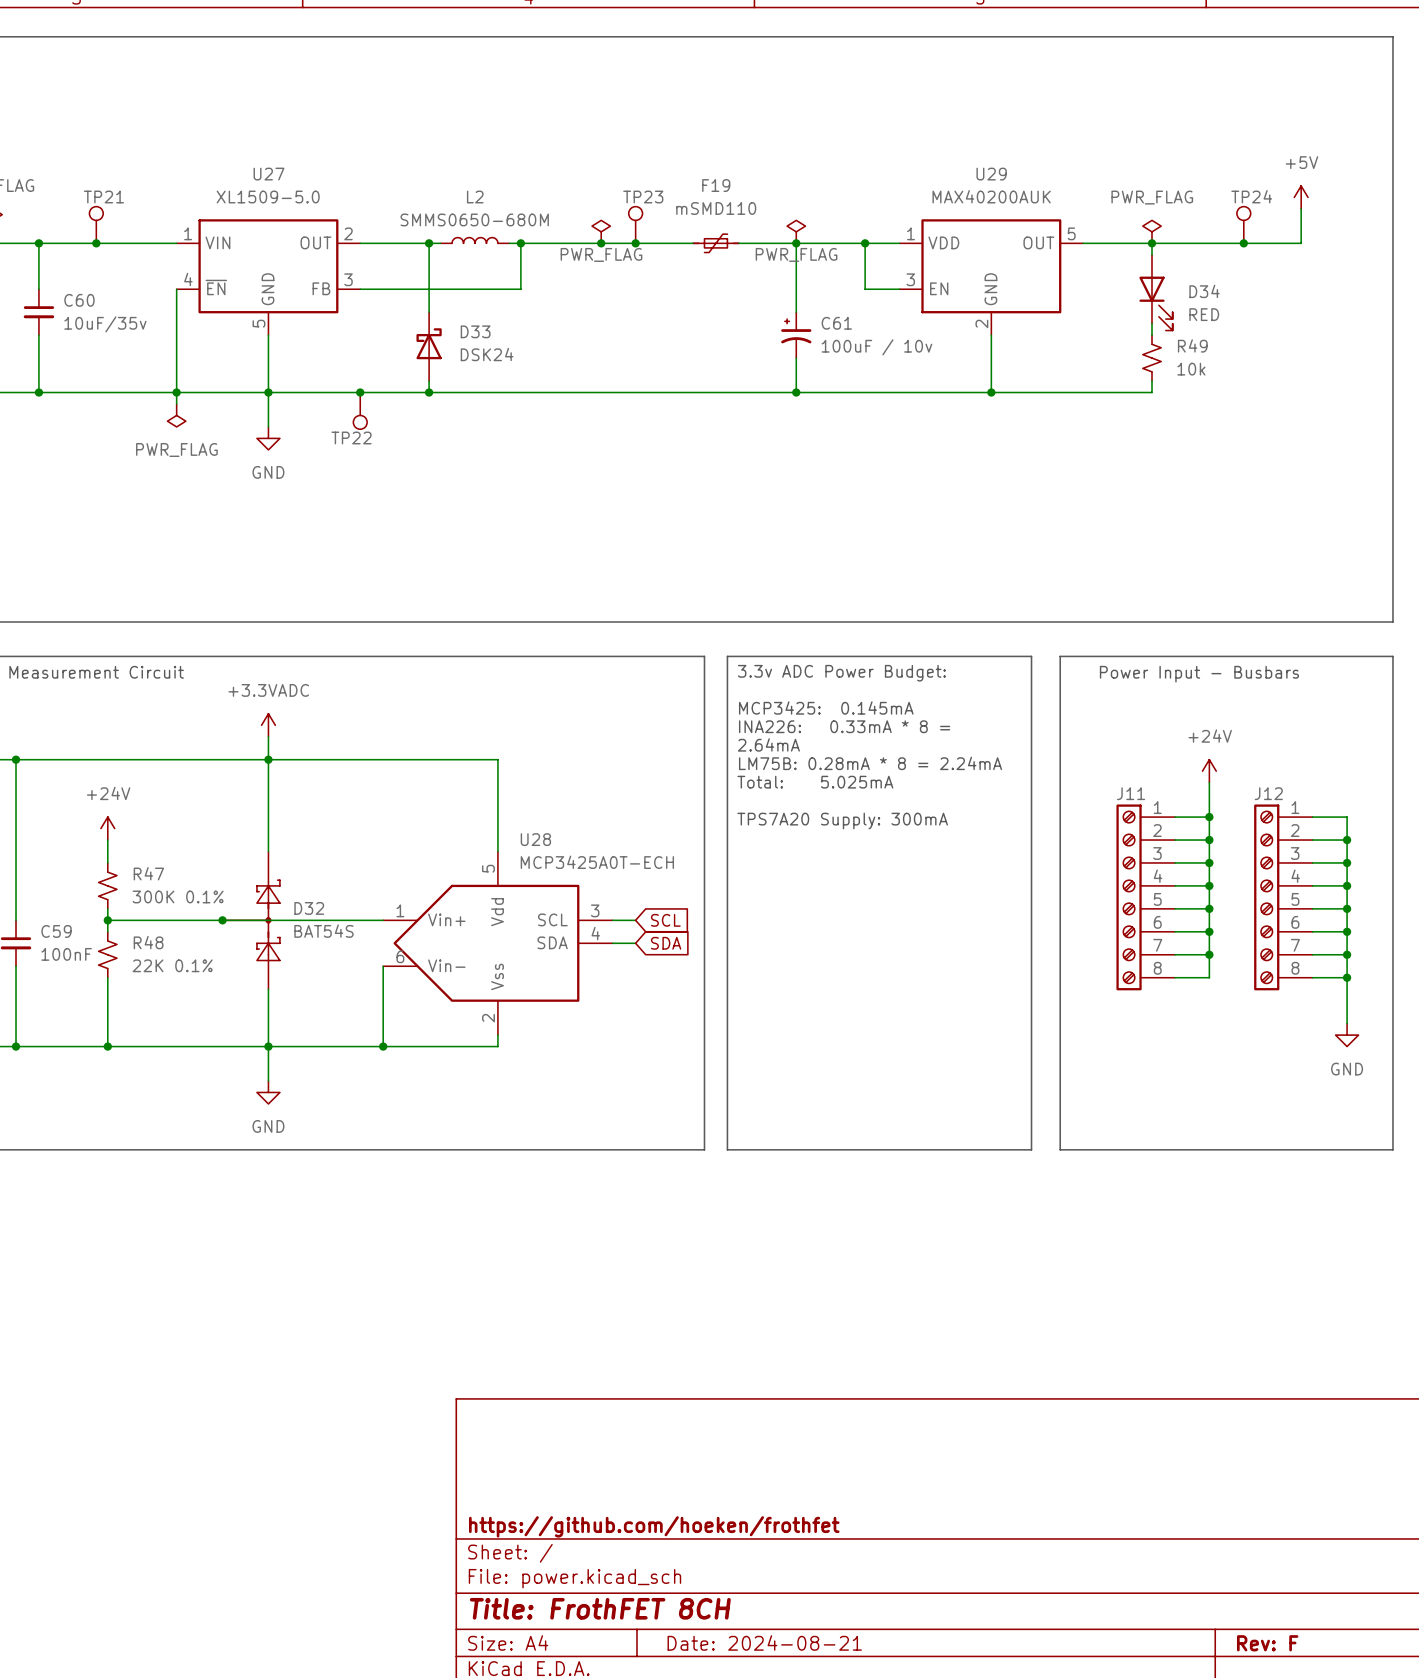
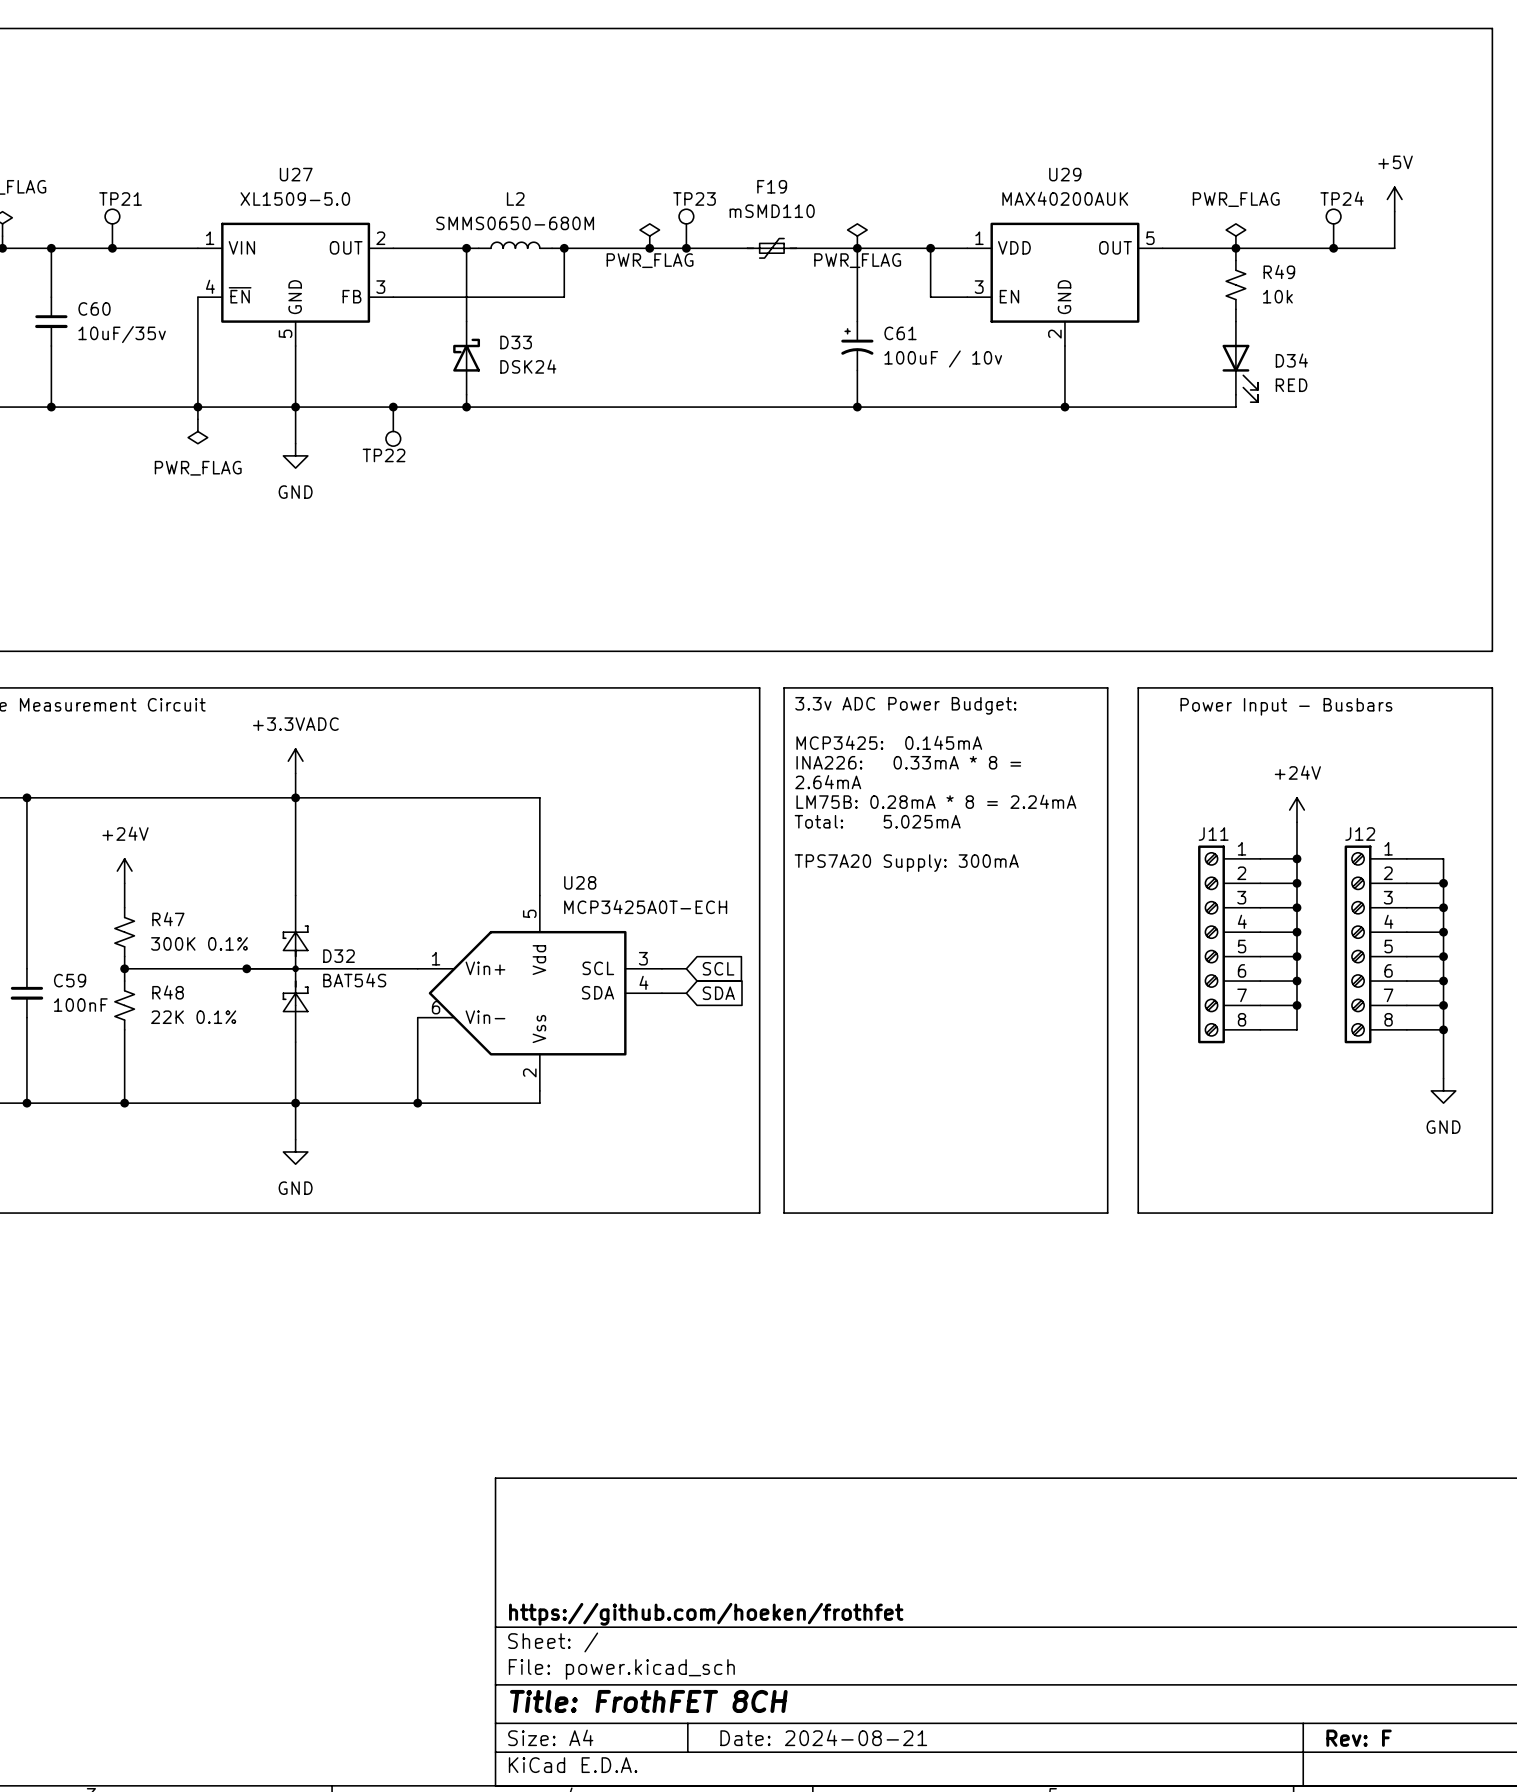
D34 position: (1156, 292) -> (1240, 361)
R49 position: (1152, 358) -> (1235, 284)

